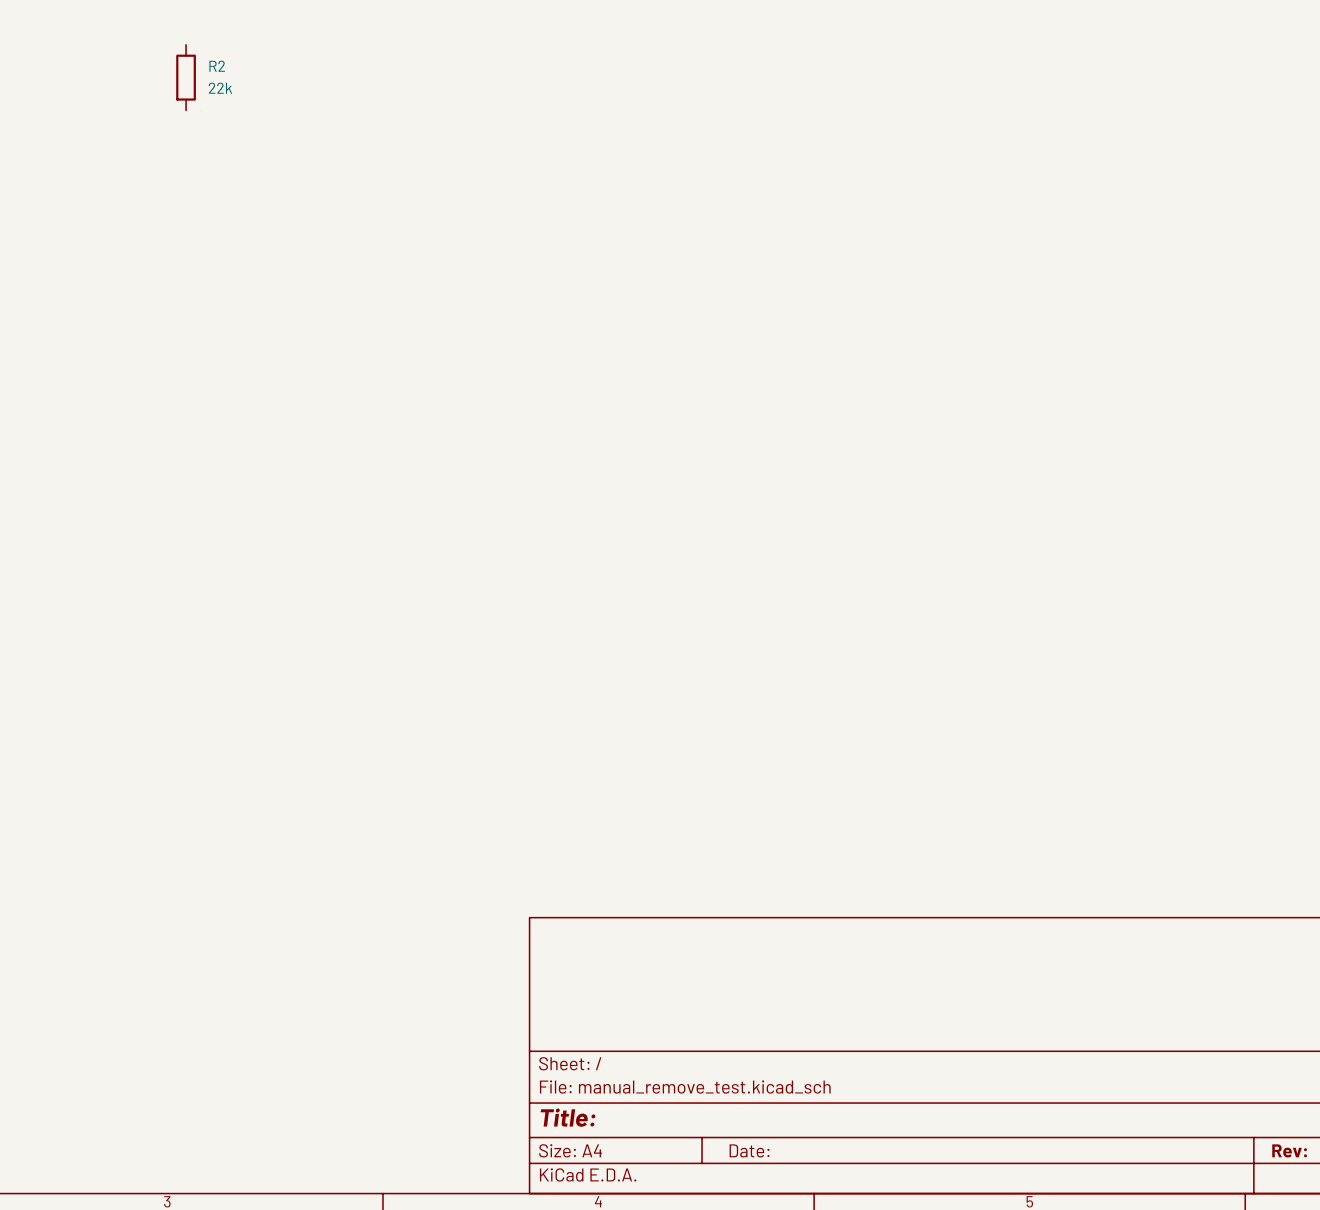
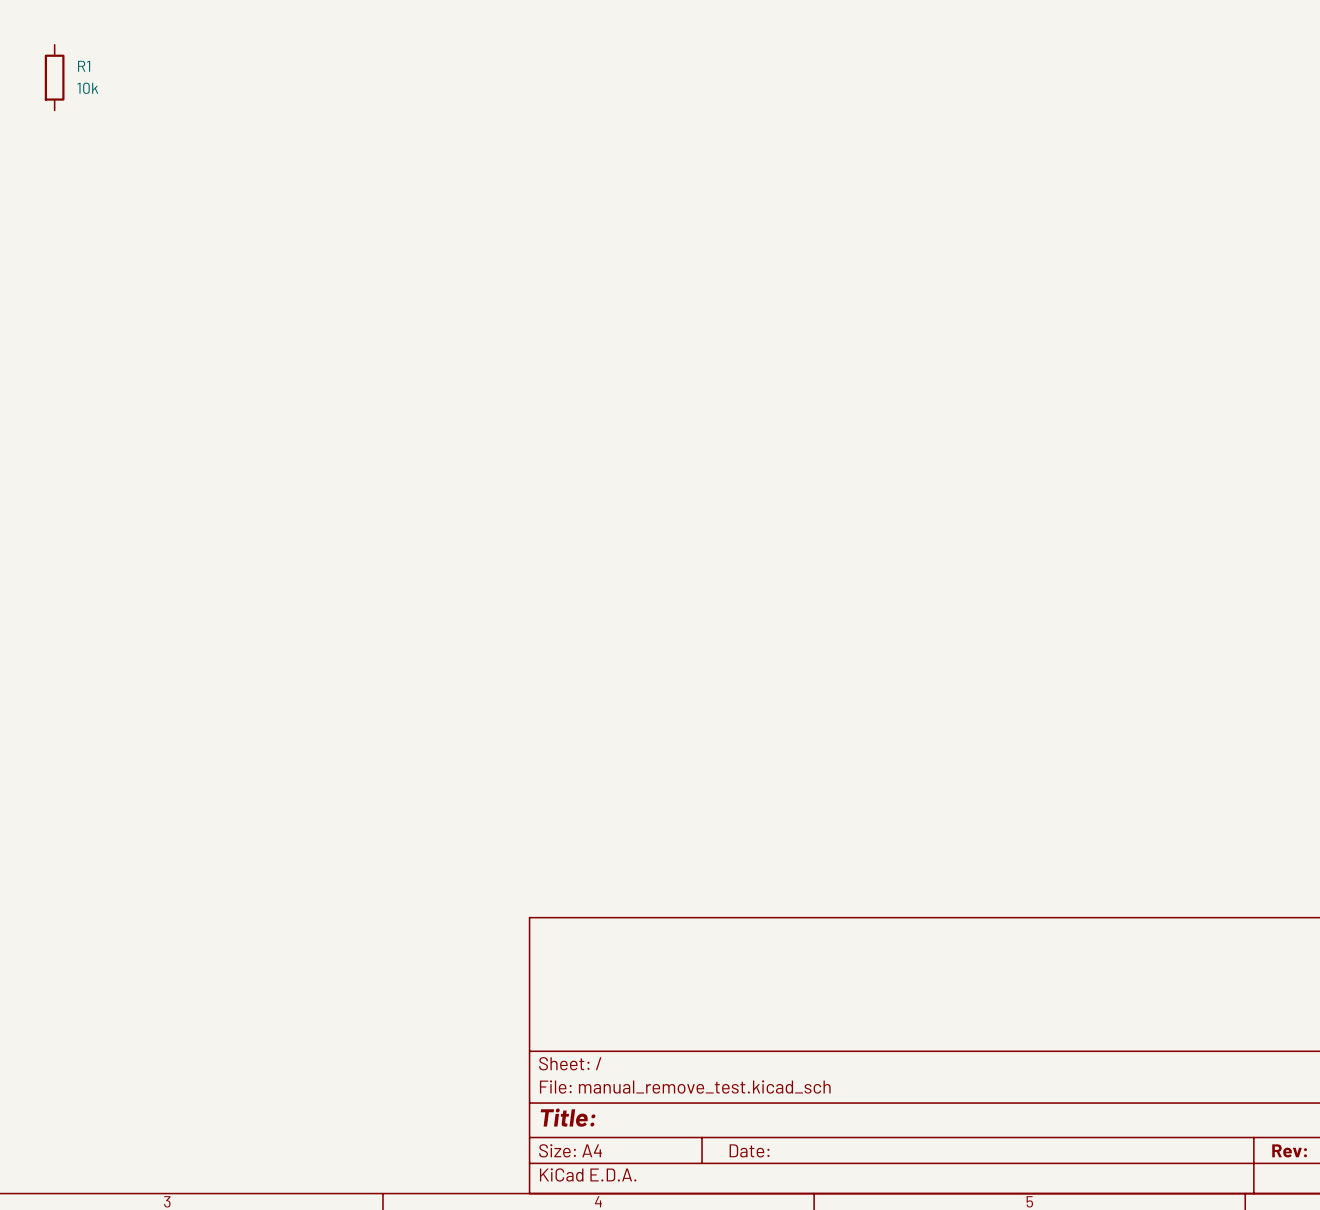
R1: none -> 10k (54, 77)
R2: 22k (186, 77) -> none

